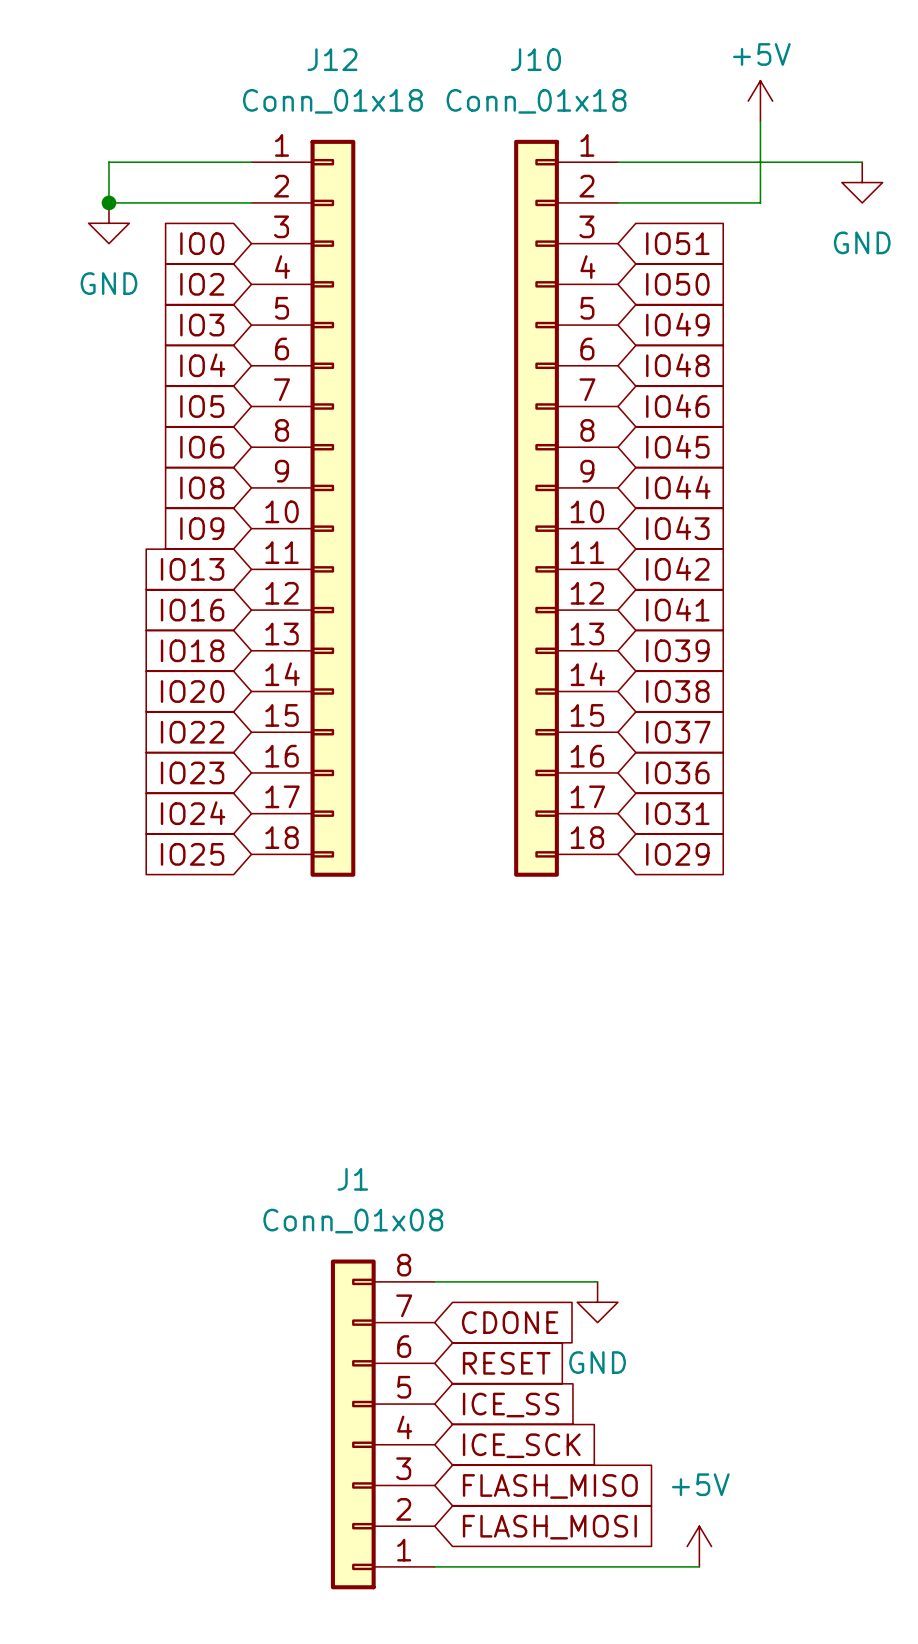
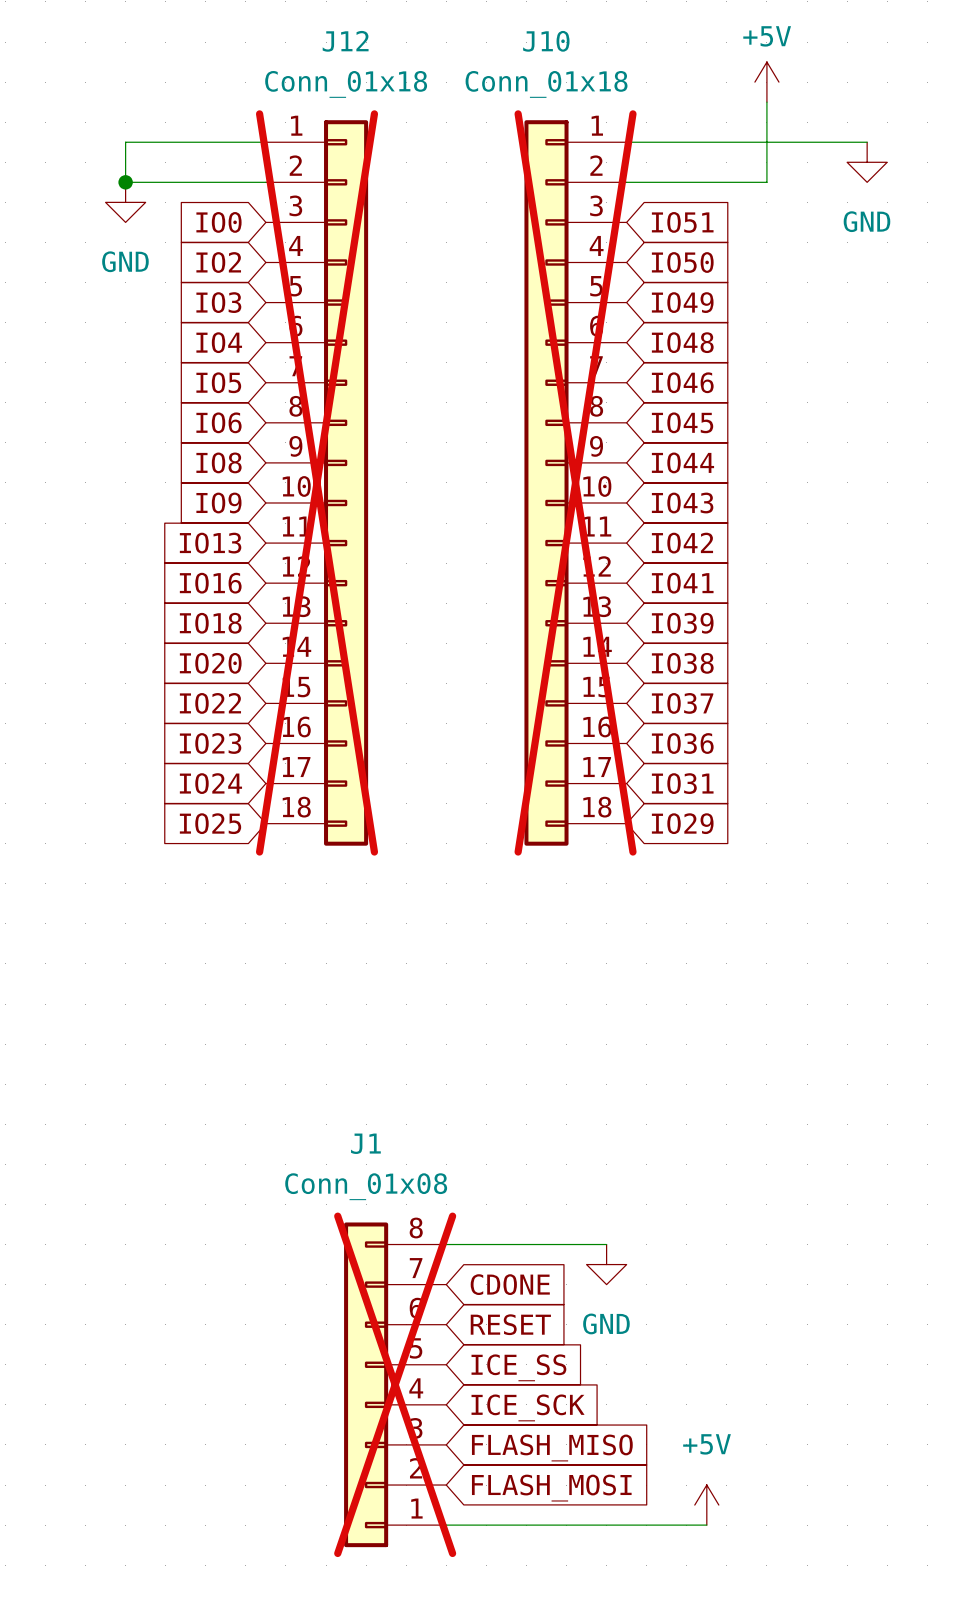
J12 do-not-place cross: none -> (317, 482)
J10 do-not-place cross: none -> (575, 482)
J1 do-not-place cross: none -> (395, 1384)

